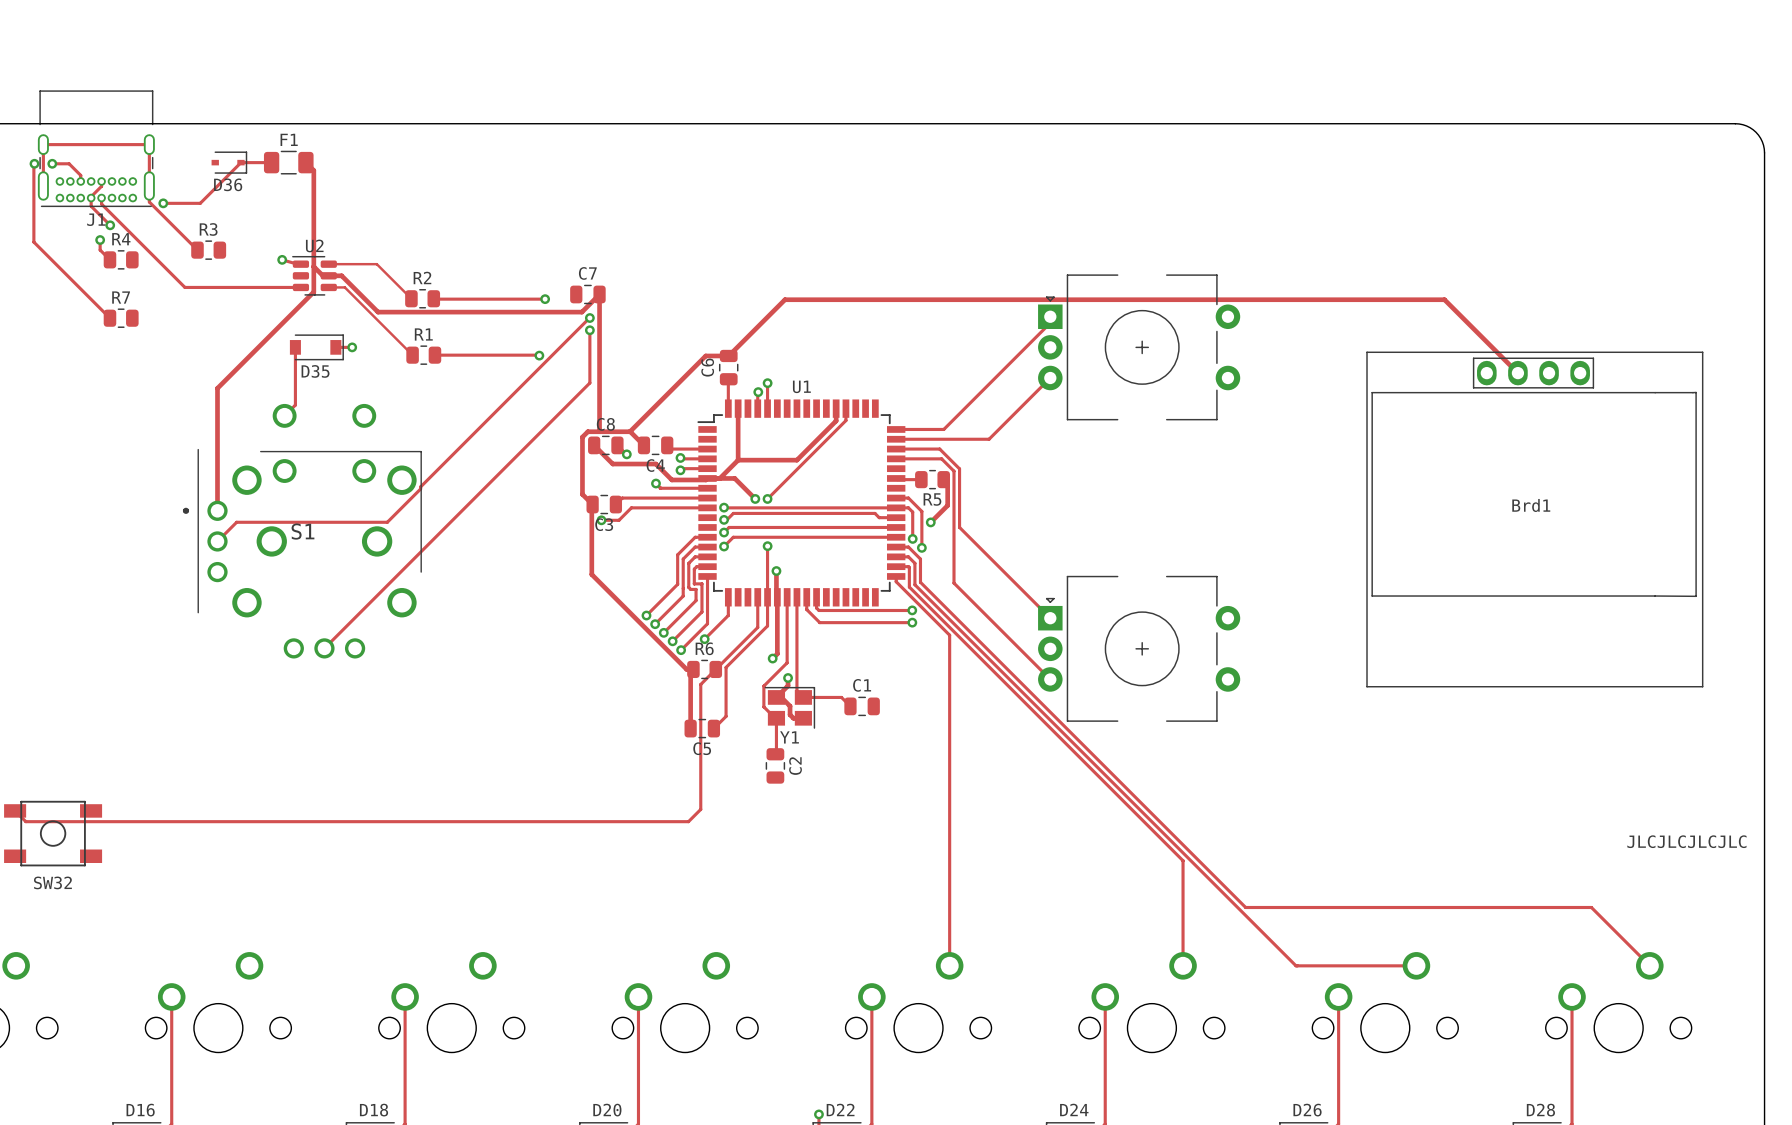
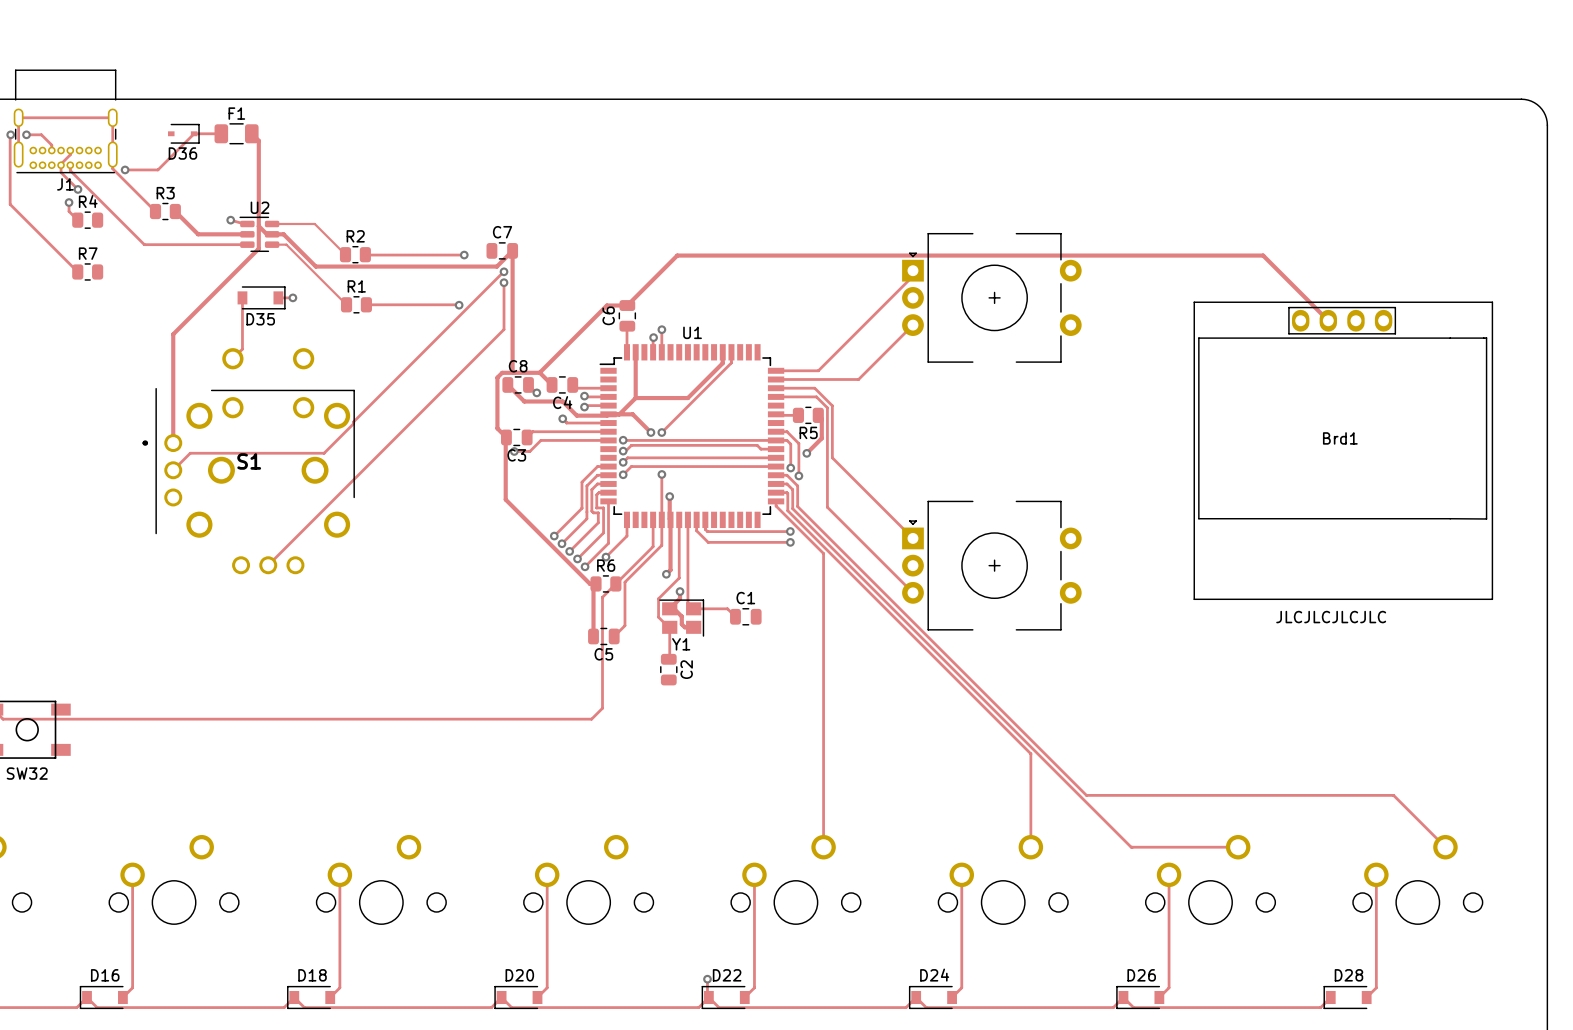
track: none -> (175, 211) (198, 234) (247, 234)
text position: JLCJLCJLCJLC (1686, 841) -> JLCJLCJLCJLC (1331, 617)

